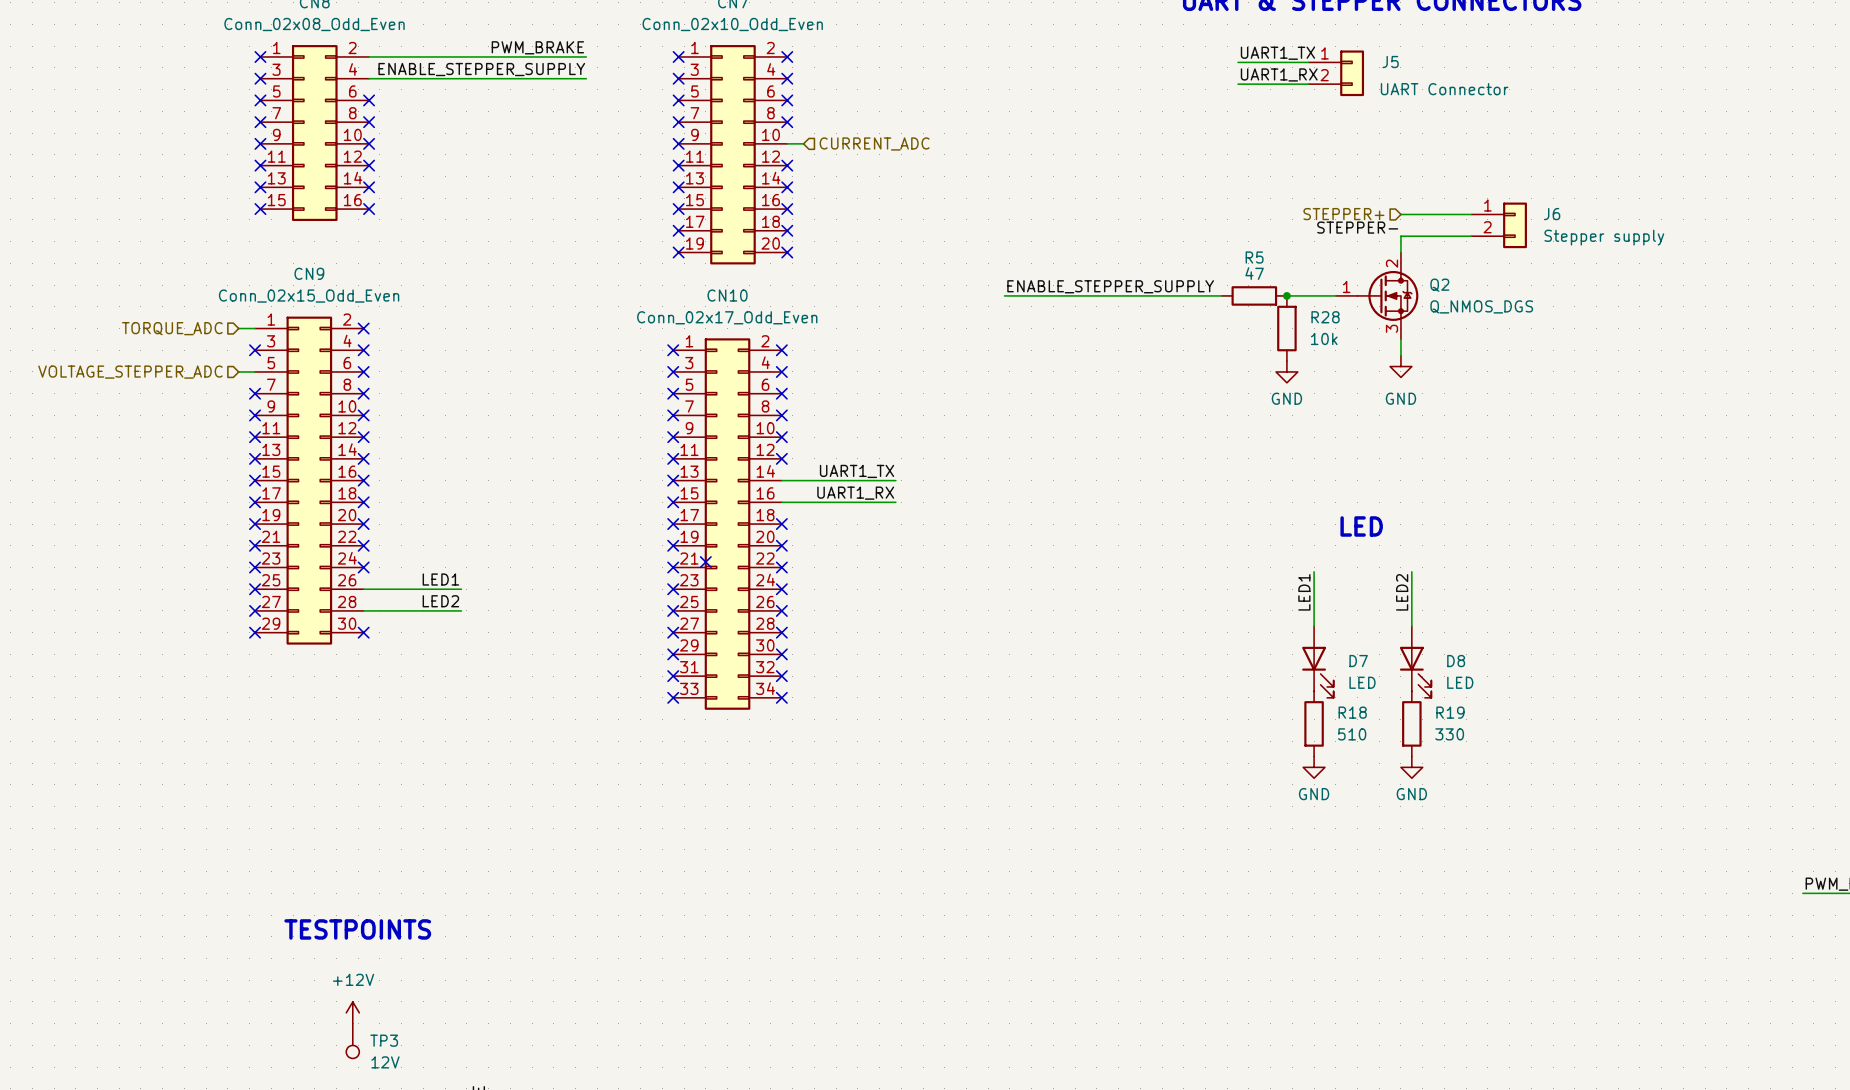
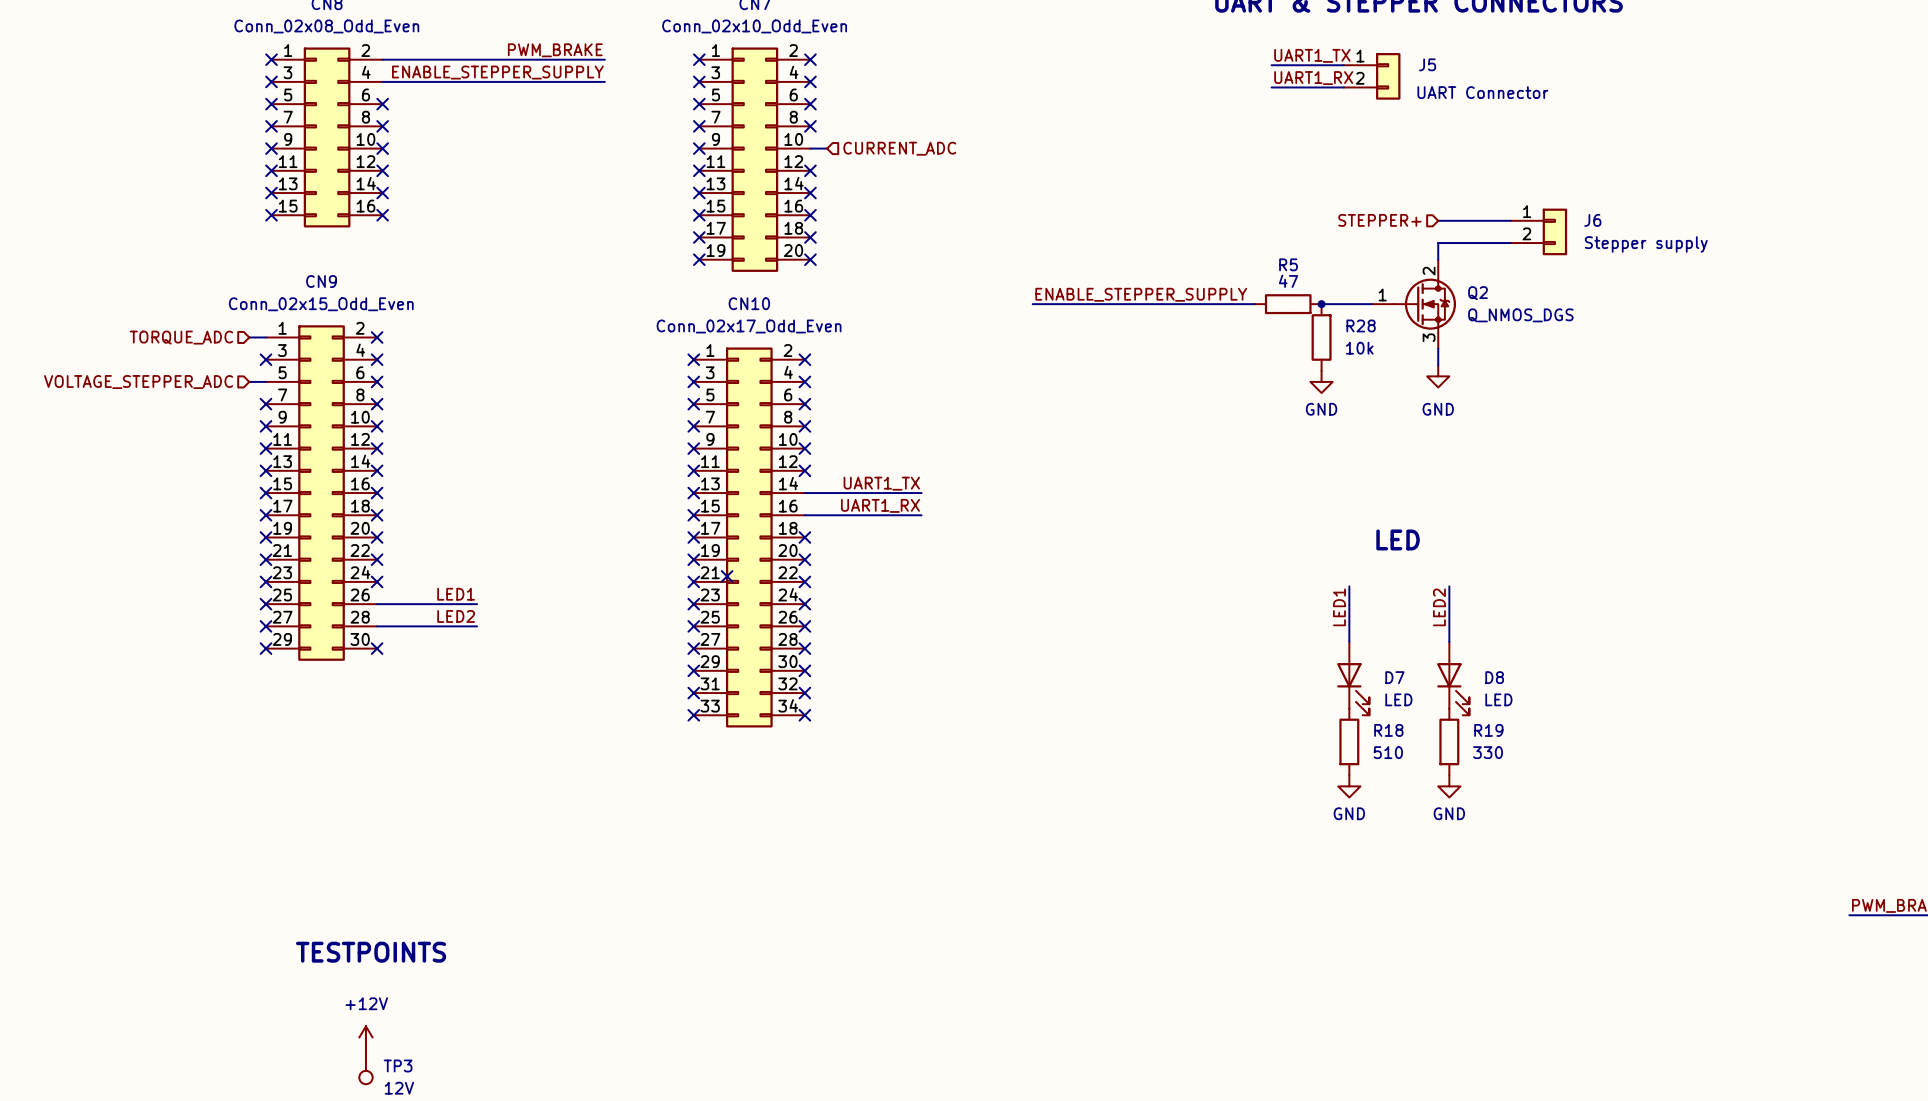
label: STEPPER- (1357, 227) -> none

